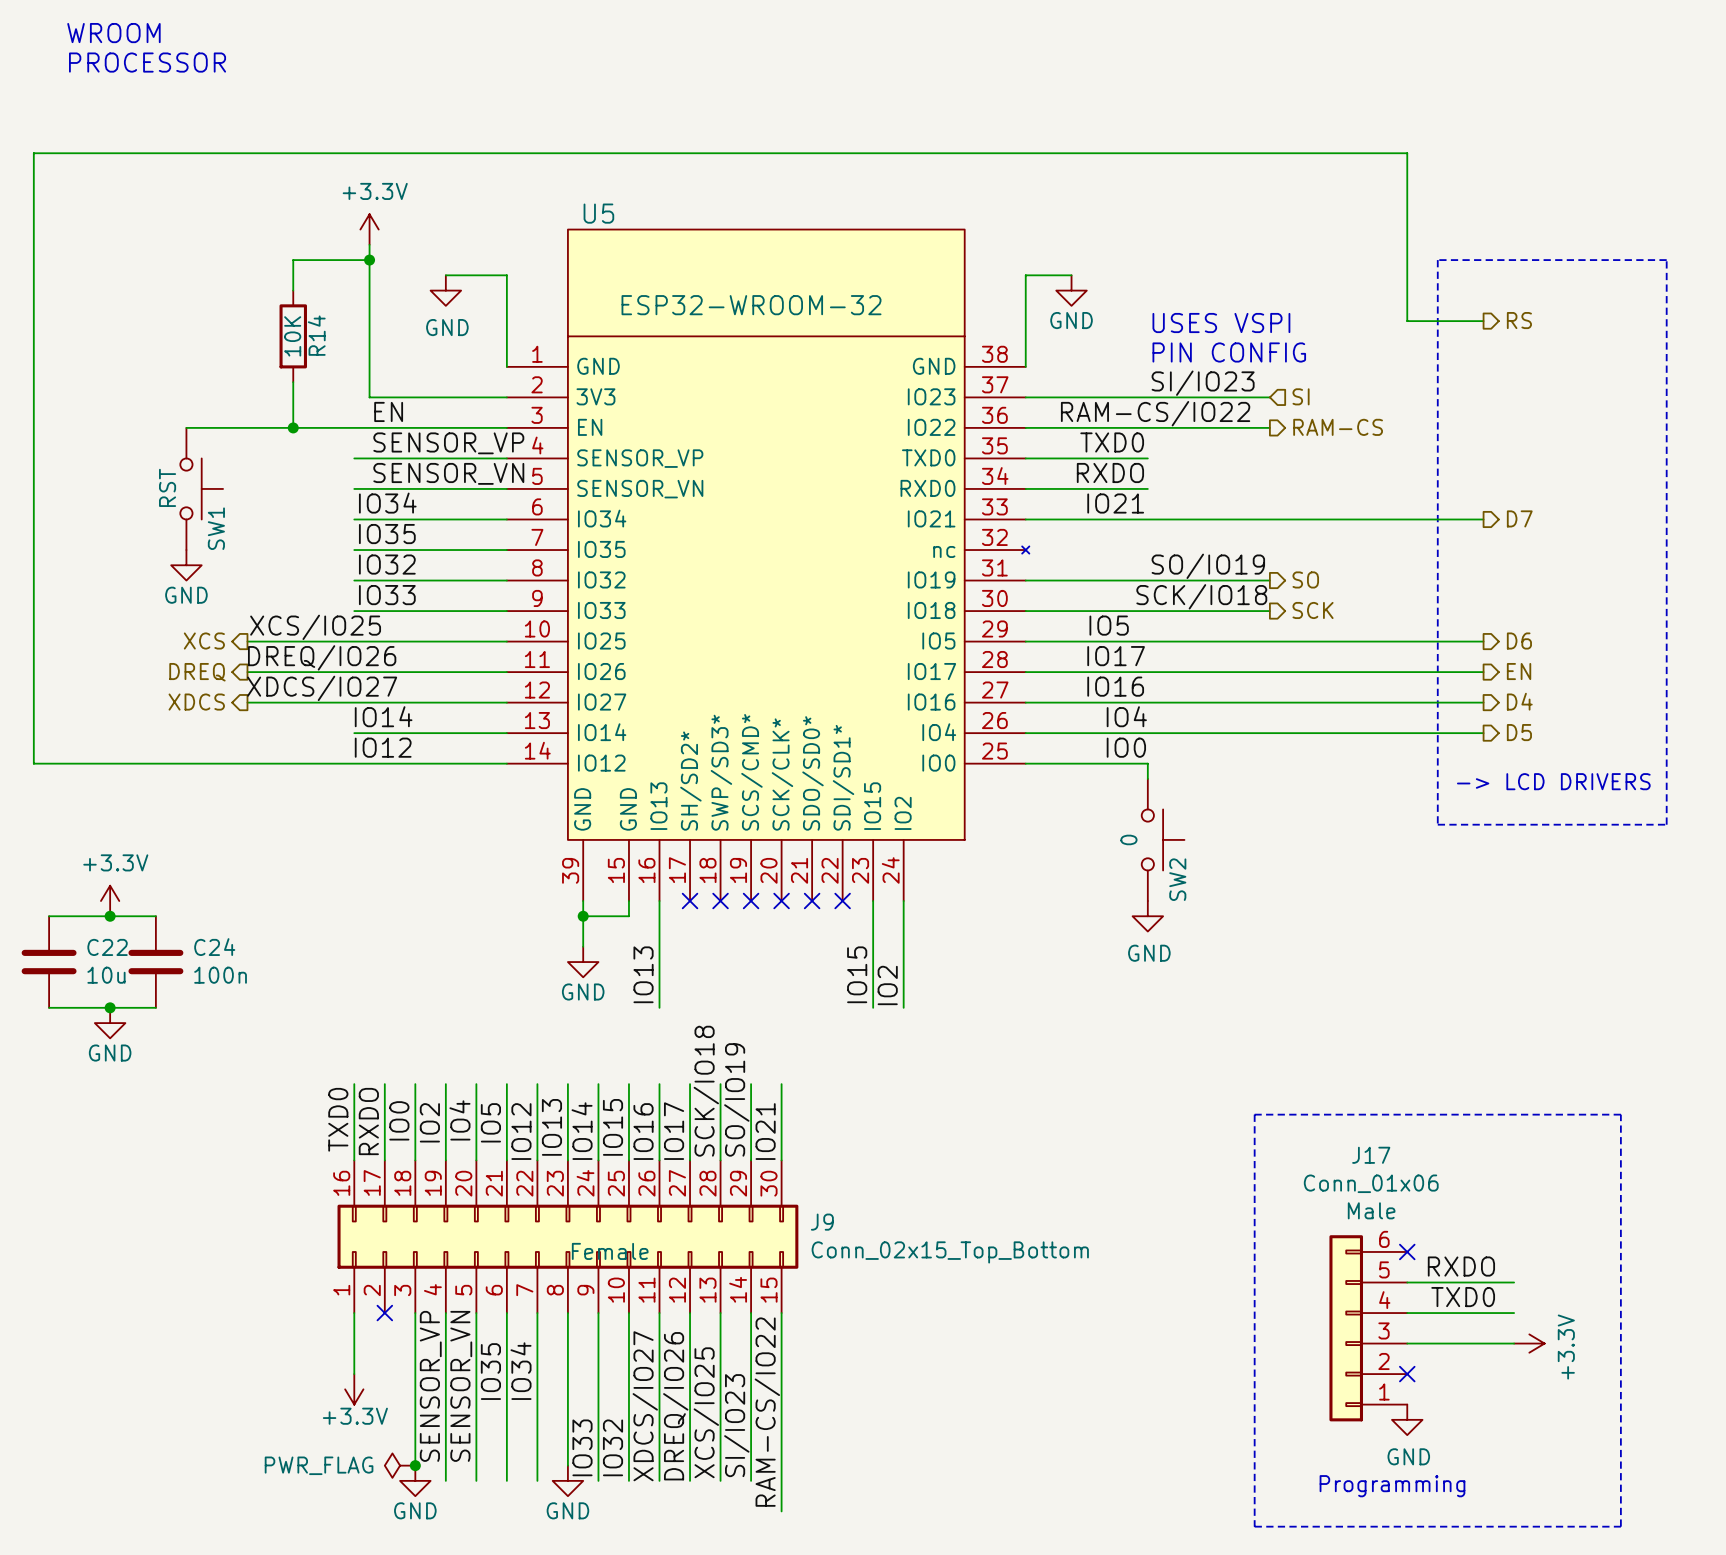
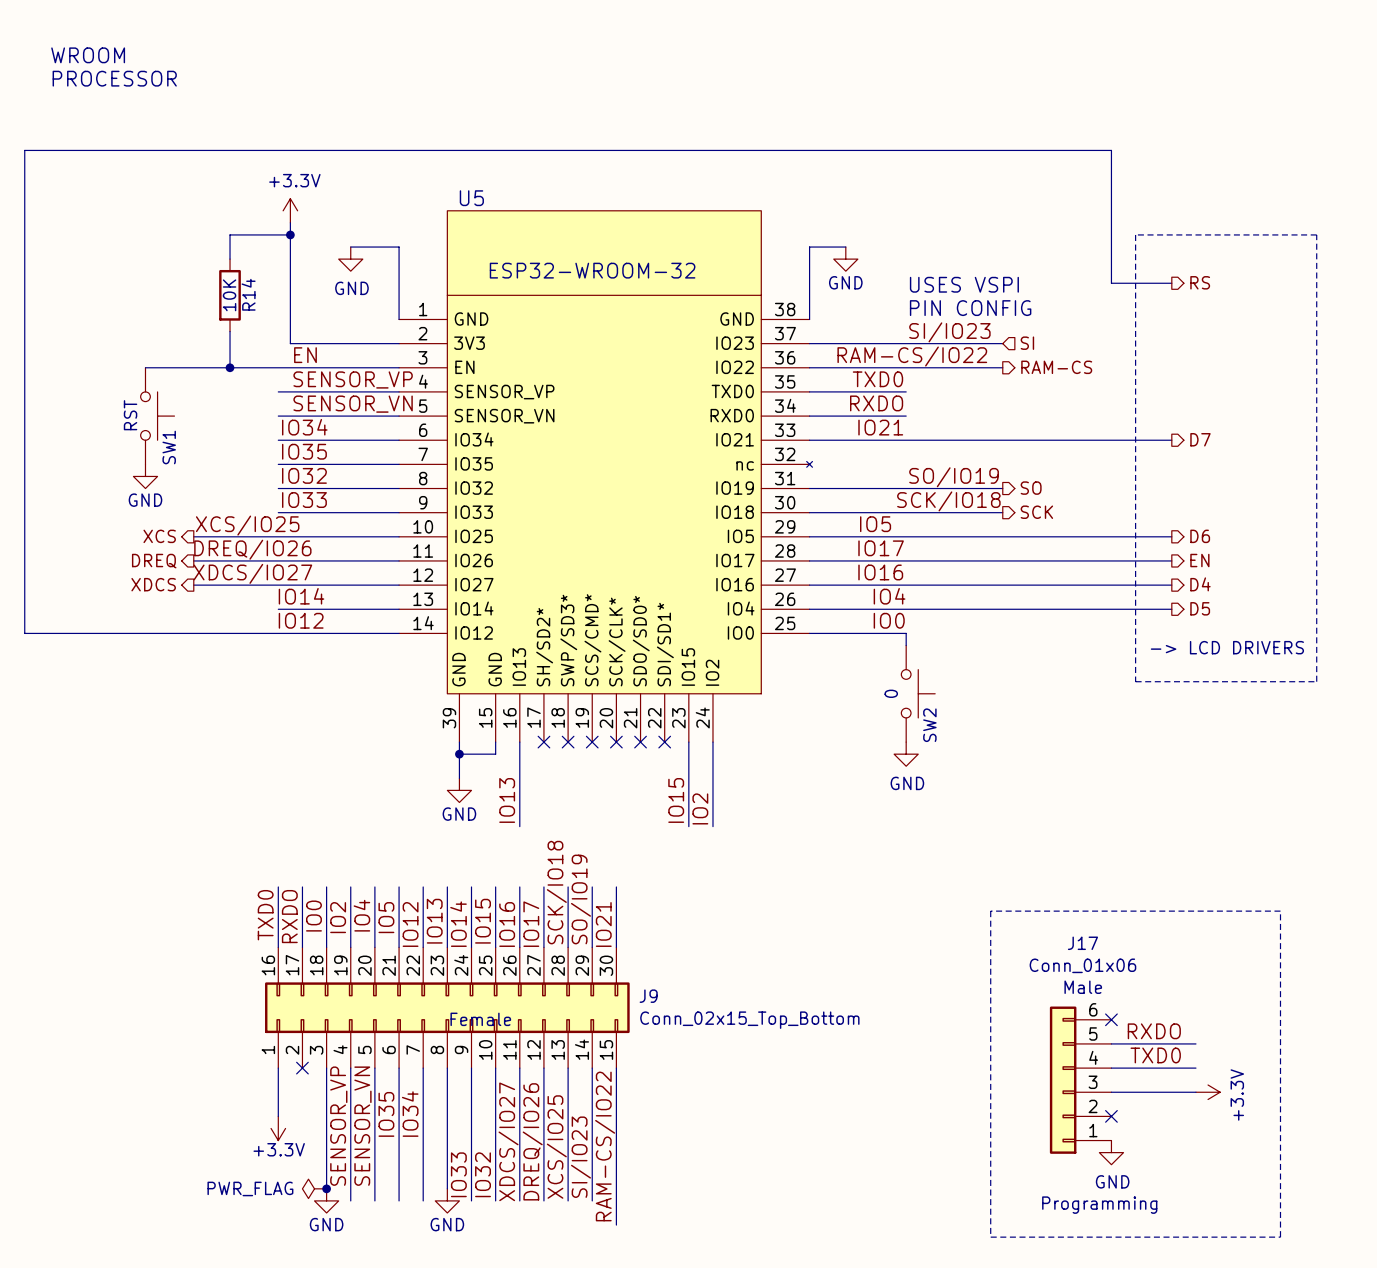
power symbol: +3.3V (110, 901) -> none
wire: (49, 916) (155, 916) -> none
junction: (110, 916) -> none
C22: 10u (49, 962) -> none
C24: 100n (155, 962) -> none
wire: (49, 1007) (155, 1007) -> none
junction: (110, 1007) -> none
power symbol: GND (110, 1023) -> none

